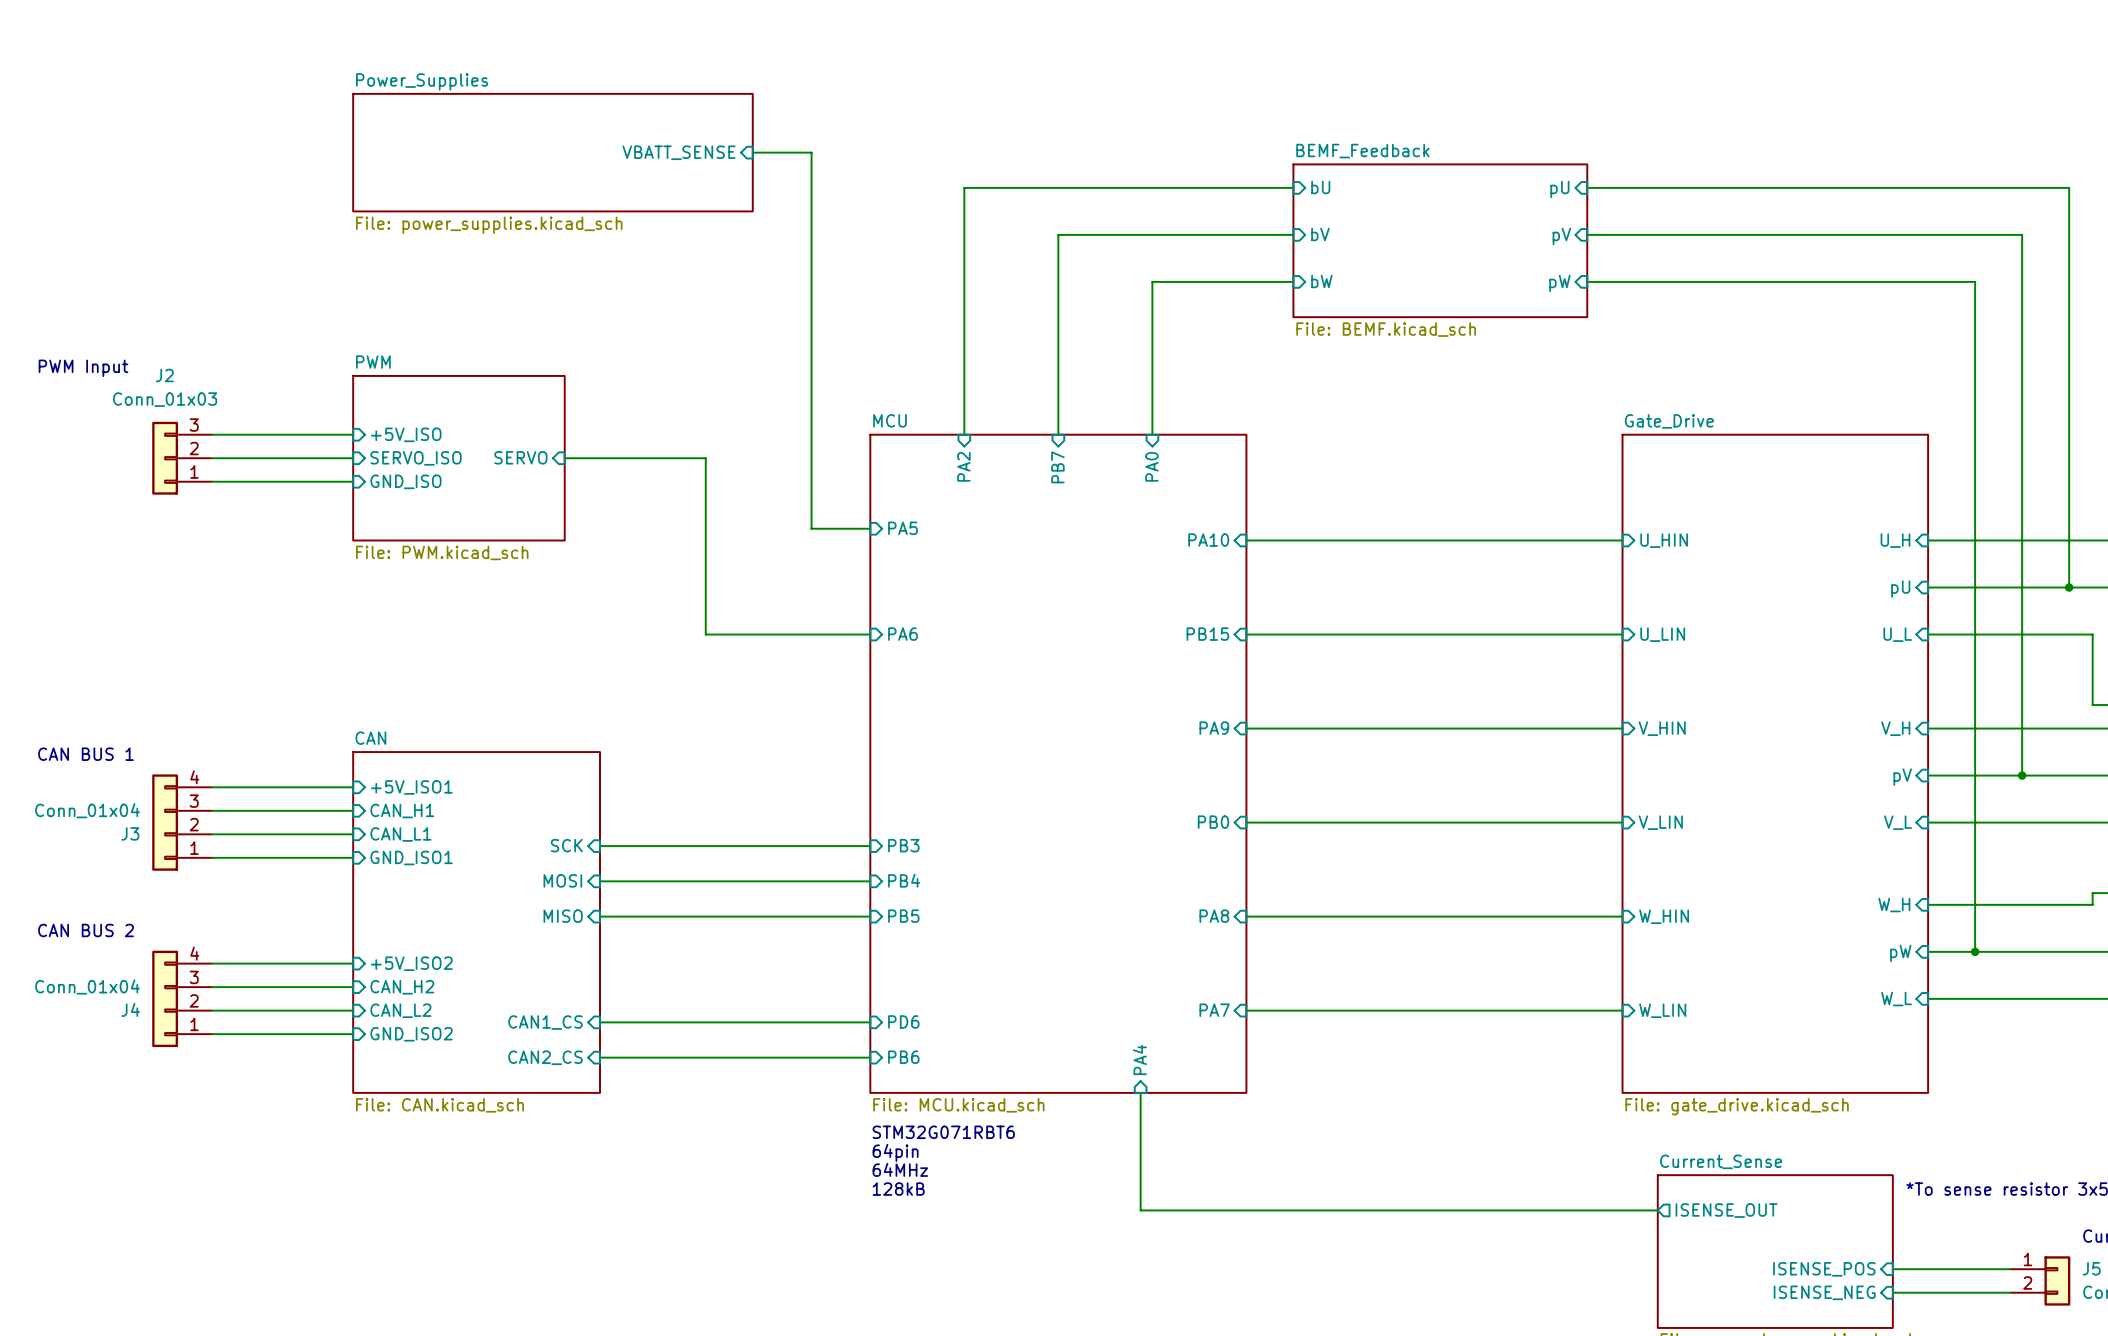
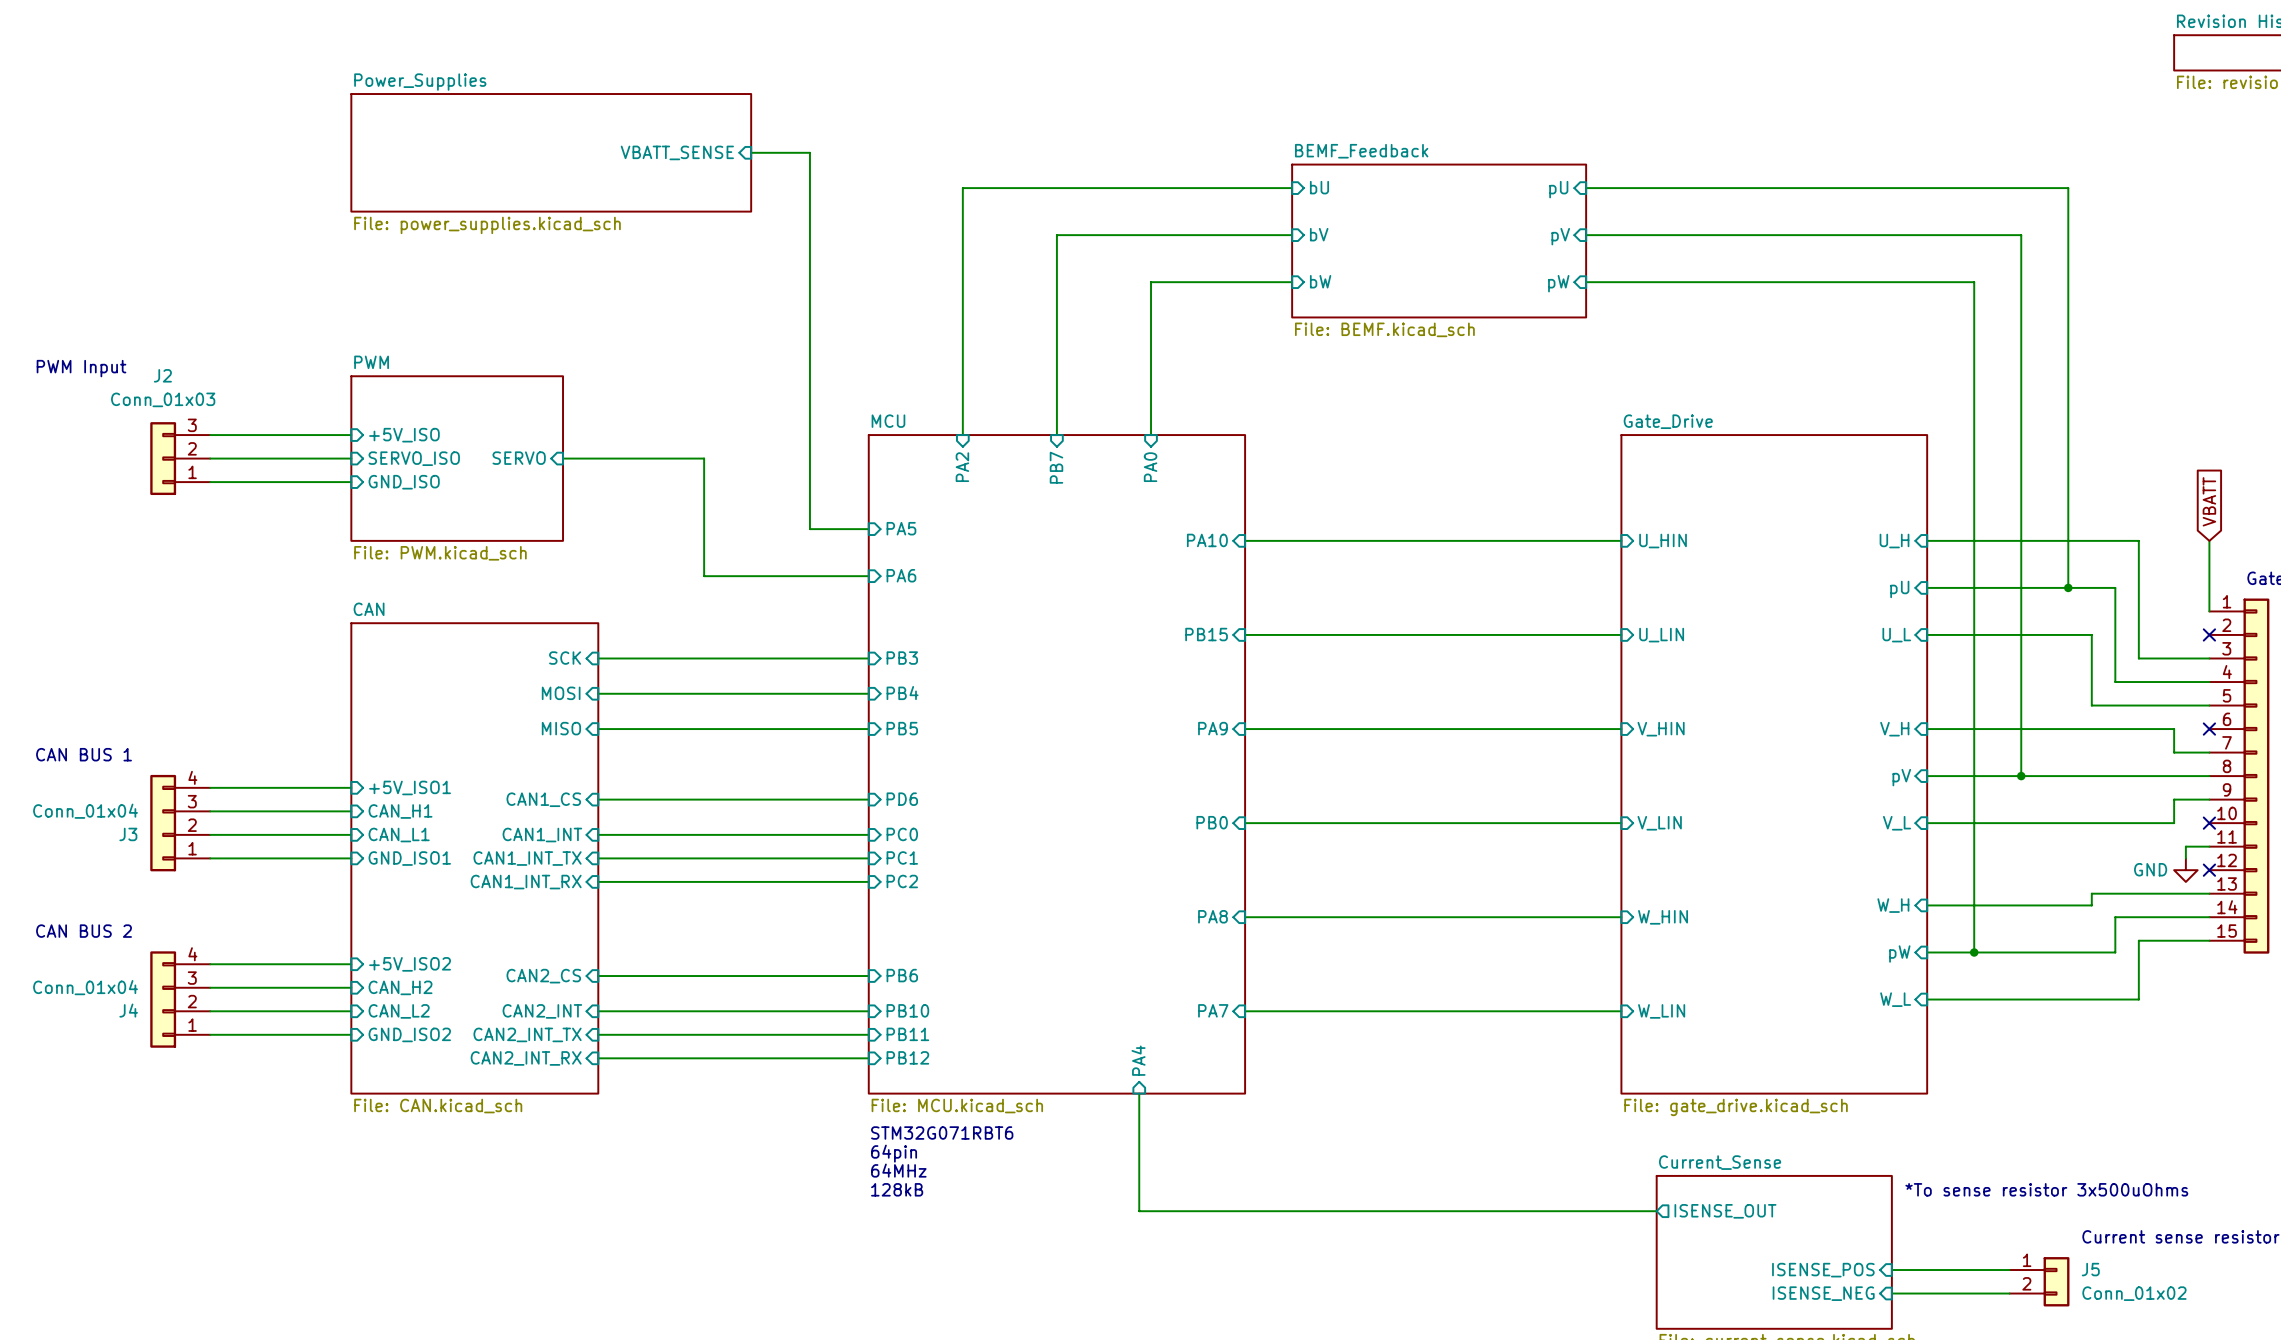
wire: (705, 575) (705, 634) (870, 634) -> (704, 576) (868, 576)
sheet pin position: PA6 (902, 634) -> PA6 (901, 575)
sheet pin: none -> MOSI (561, 693)
sheet pin: none -> PB4 (902, 693)
wire: none -> (598, 693) (868, 693)
wire: none -> (598, 799) (868, 799)
sheet pin: none -> PC0 (902, 834)
sheet pin: none -> CAN1_INT (542, 835)
sheet pin position: SCK (566, 845) -> SCK (565, 658)
sheet pin position: PB3 (903, 845) -> PB3 (902, 658)
wire: (599, 846) (870, 846) -> (598, 658) (868, 658)
sheet CAN: none -> File: CAN.kicad_sch (474, 858)
sheet pin: none -> CAN1_INT_TX (527, 858)
wire: none -> (598, 858) (868, 858)
sheet pin: none -> PC1 (902, 857)
sheet pin: MOSI (562, 880) -> CAN1_INT_RX (526, 882)
sheet pin: PB4 (904, 880) -> PC2 (902, 881)
sheet pin position: MISO (563, 916) -> MISO (561, 728)
wire: (599, 916) (870, 916) -> (598, 729) (868, 729)
sheet pin position: PB5 (903, 916) -> PB5 (902, 728)
sheet CAN: File: CAN.kicad_sch (476, 922) -> none
sheet pin: none -> PB6 (902, 975)
sheet pin: none -> CAN2_CS (543, 976)
wire: none -> (598, 976) (868, 976)
sheet pin: none -> CAN2_INT (542, 1011)
wire: none -> (598, 1011) (868, 1011)
sheet pin: none -> PB10 (907, 1010)
sheet pin position: PD6 (903, 1021) -> PD6 (902, 799)
sheet pin position: CAN1_CS (545, 1022) -> CAN1_CS (543, 799)
wire: (599, 1022) (870, 1022) -> (598, 834) (868, 834)
sheet pin: none -> PB11 (907, 1034)
sheet pin: none -> CAN2_INT_TX (527, 1034)
wire: none -> (598, 1034) (868, 1034)
sheet pin: CAN2_CS (545, 1057) -> CAN2_INT_RX (526, 1058)
sheet pin: PB6 (903, 1057) -> PB12 (907, 1057)

